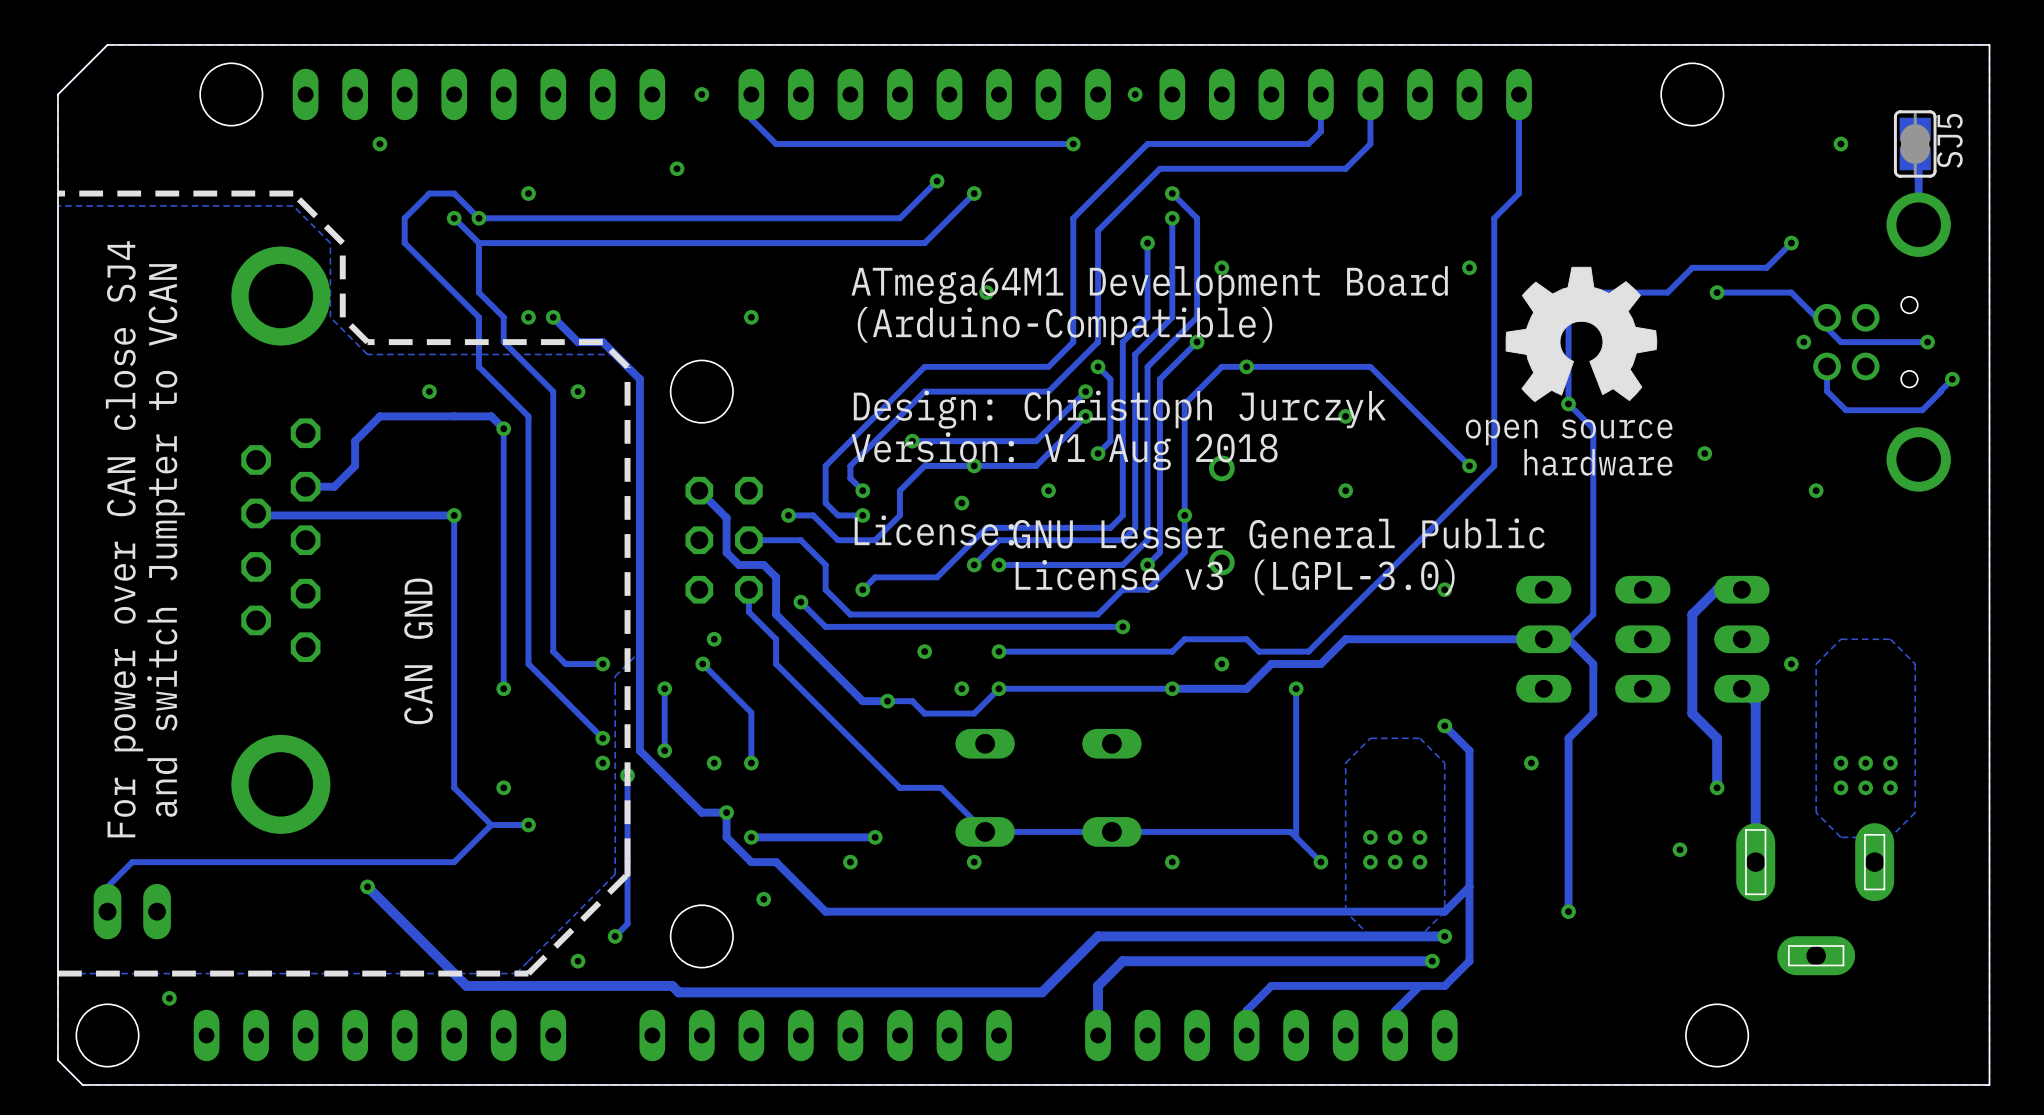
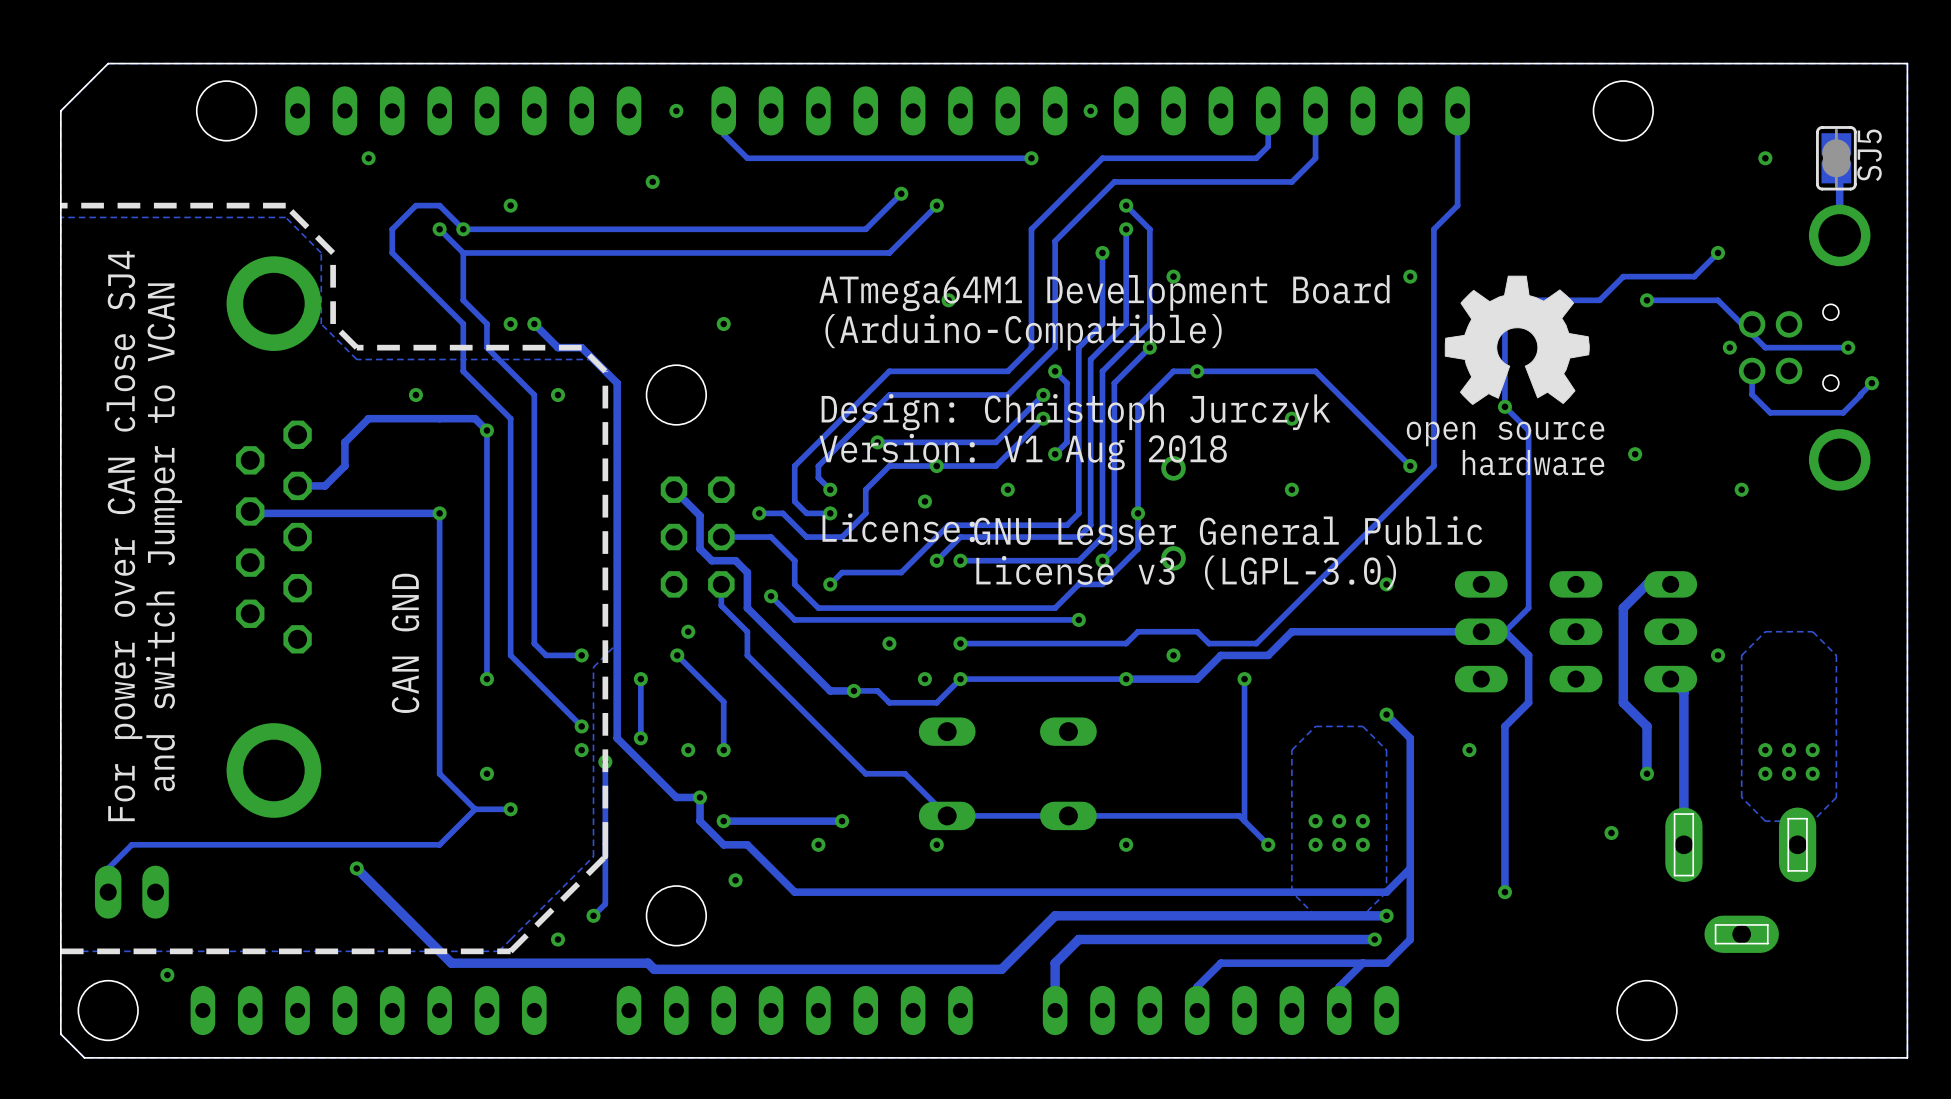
text: and switch Jumpter to VCAN (165, 540) -> and switch Jumper to VCAN (164, 537)

